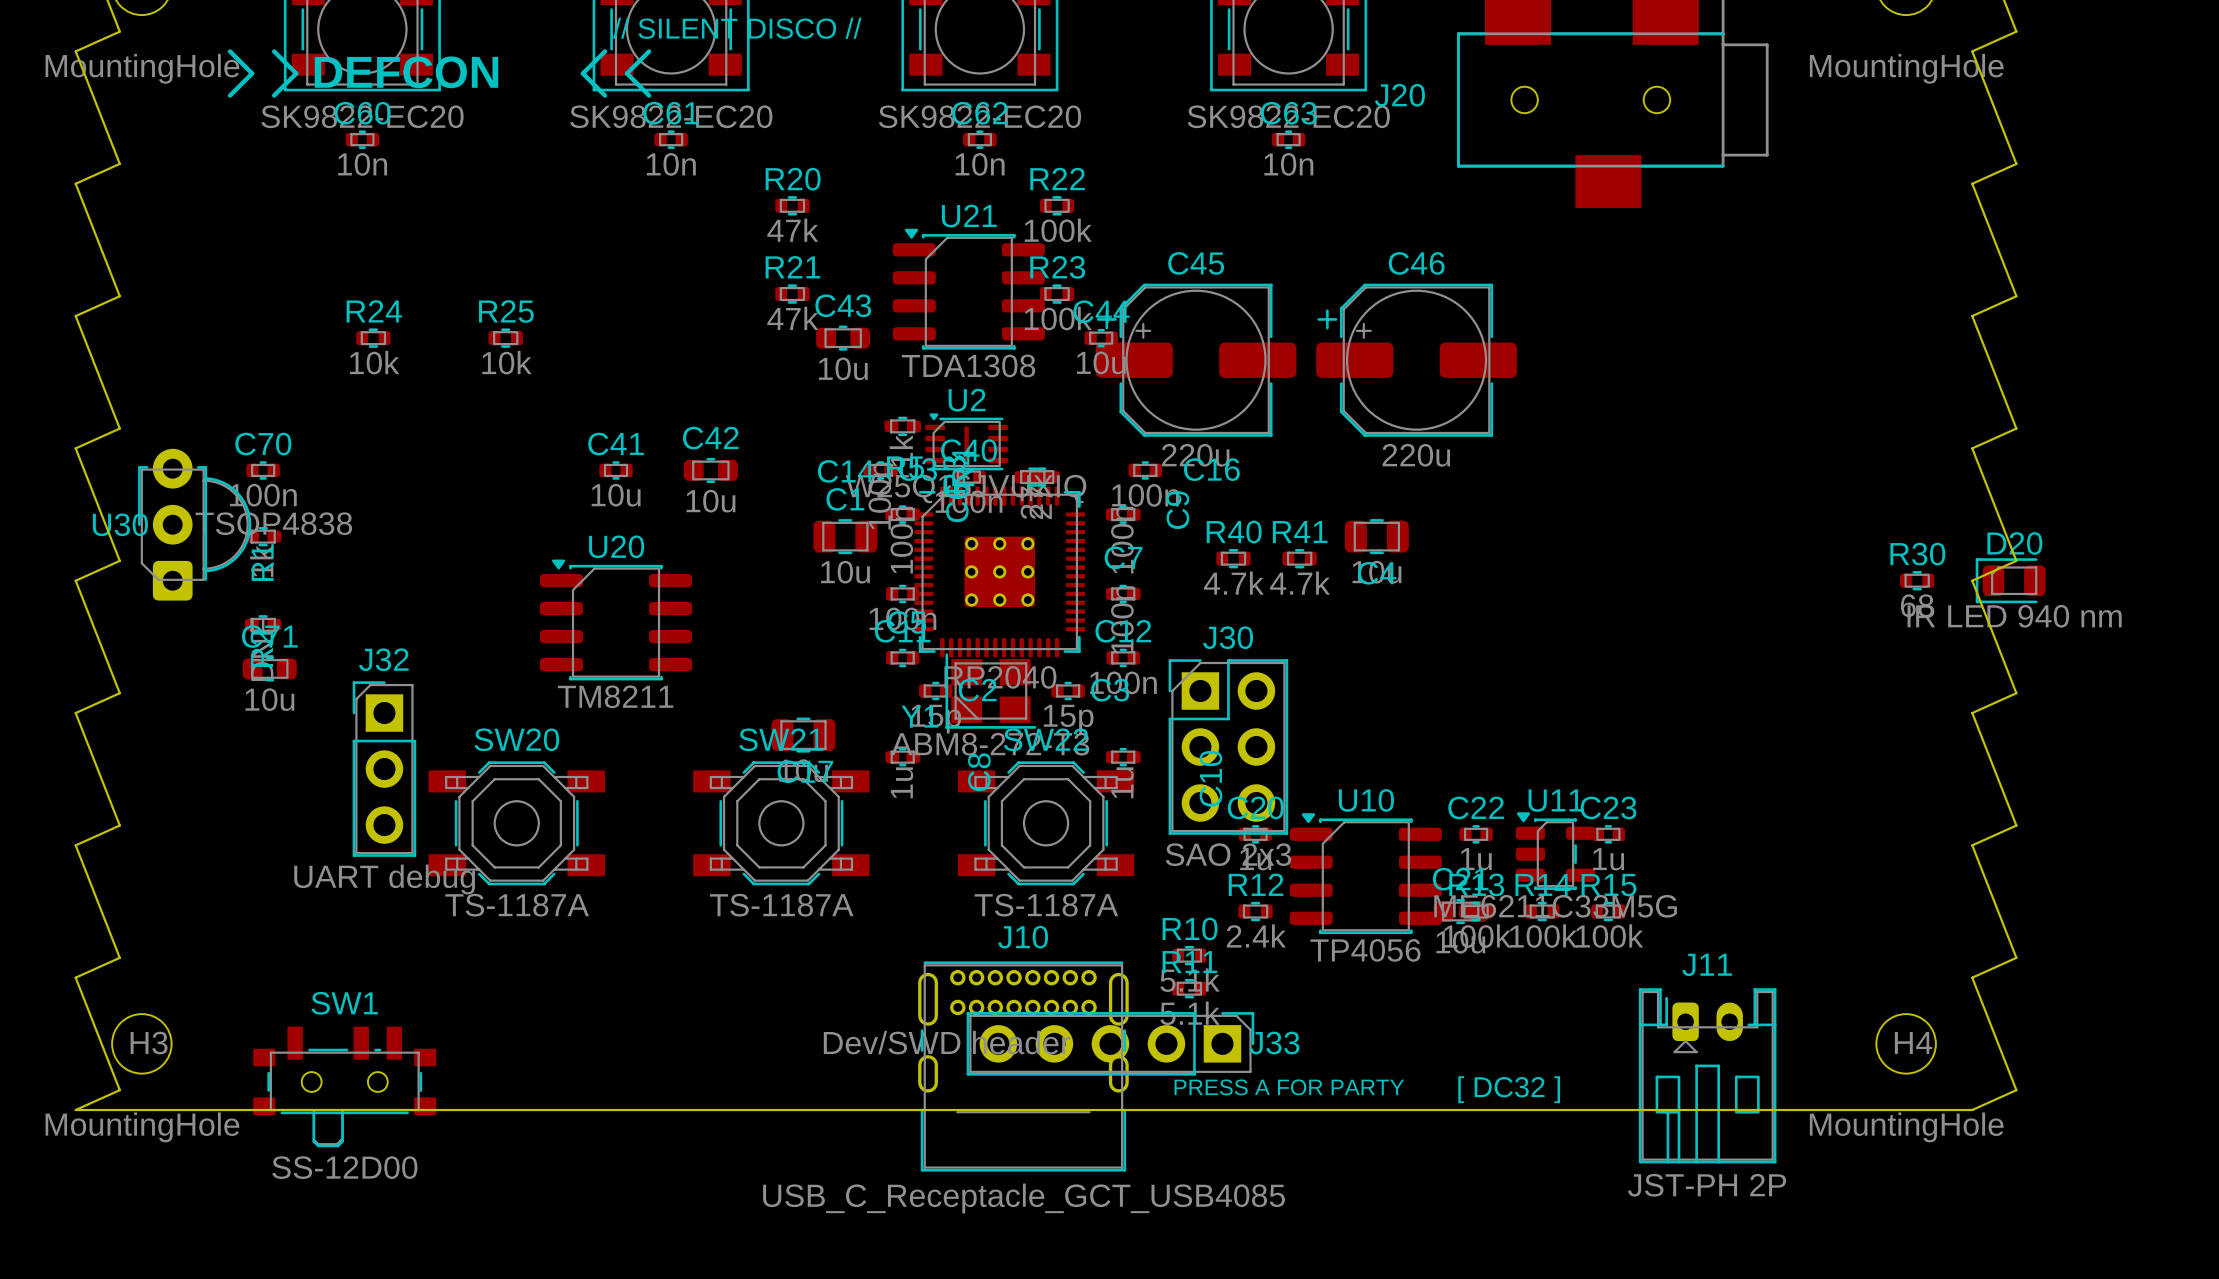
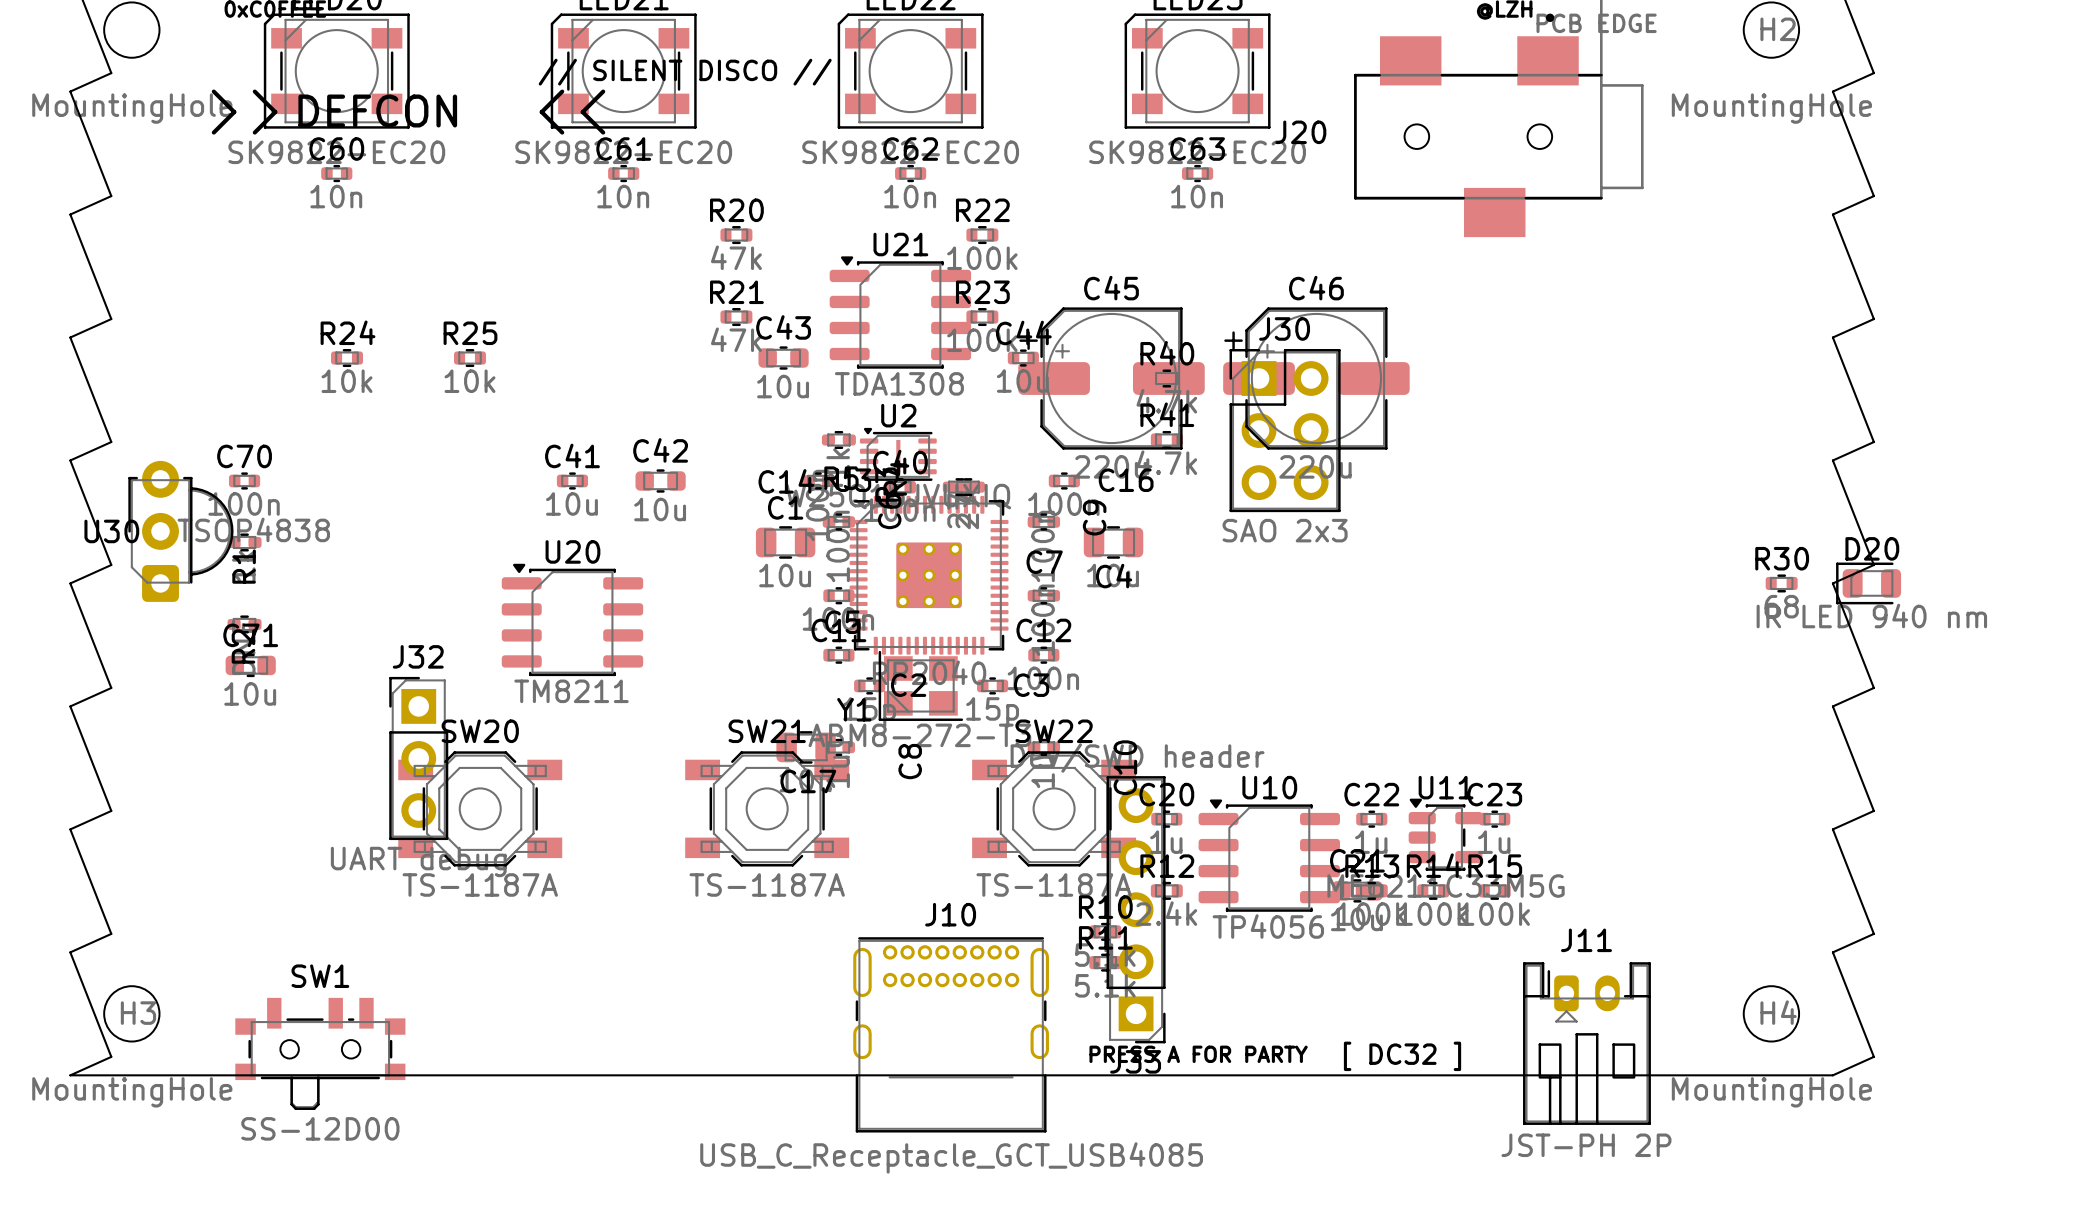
C4 position: (1376, 536) -> (1113, 542)
R40 position: (1233, 558) -> (1166, 378)
R41 position: (1299, 558) -> (1166, 439)
C17 position: (803, 735) -> (806, 747)
J30 position: (1228, 747) -> (1285, 430)
J32 position: (384, 769) -> (418, 758)
SW21 position: (781, 823) -> (767, 808)
SW22 position: (1046, 823) -> (1054, 808)
J33 rotation: 0° (1110, 1043) -> 90° clockwise (1136, 909)

